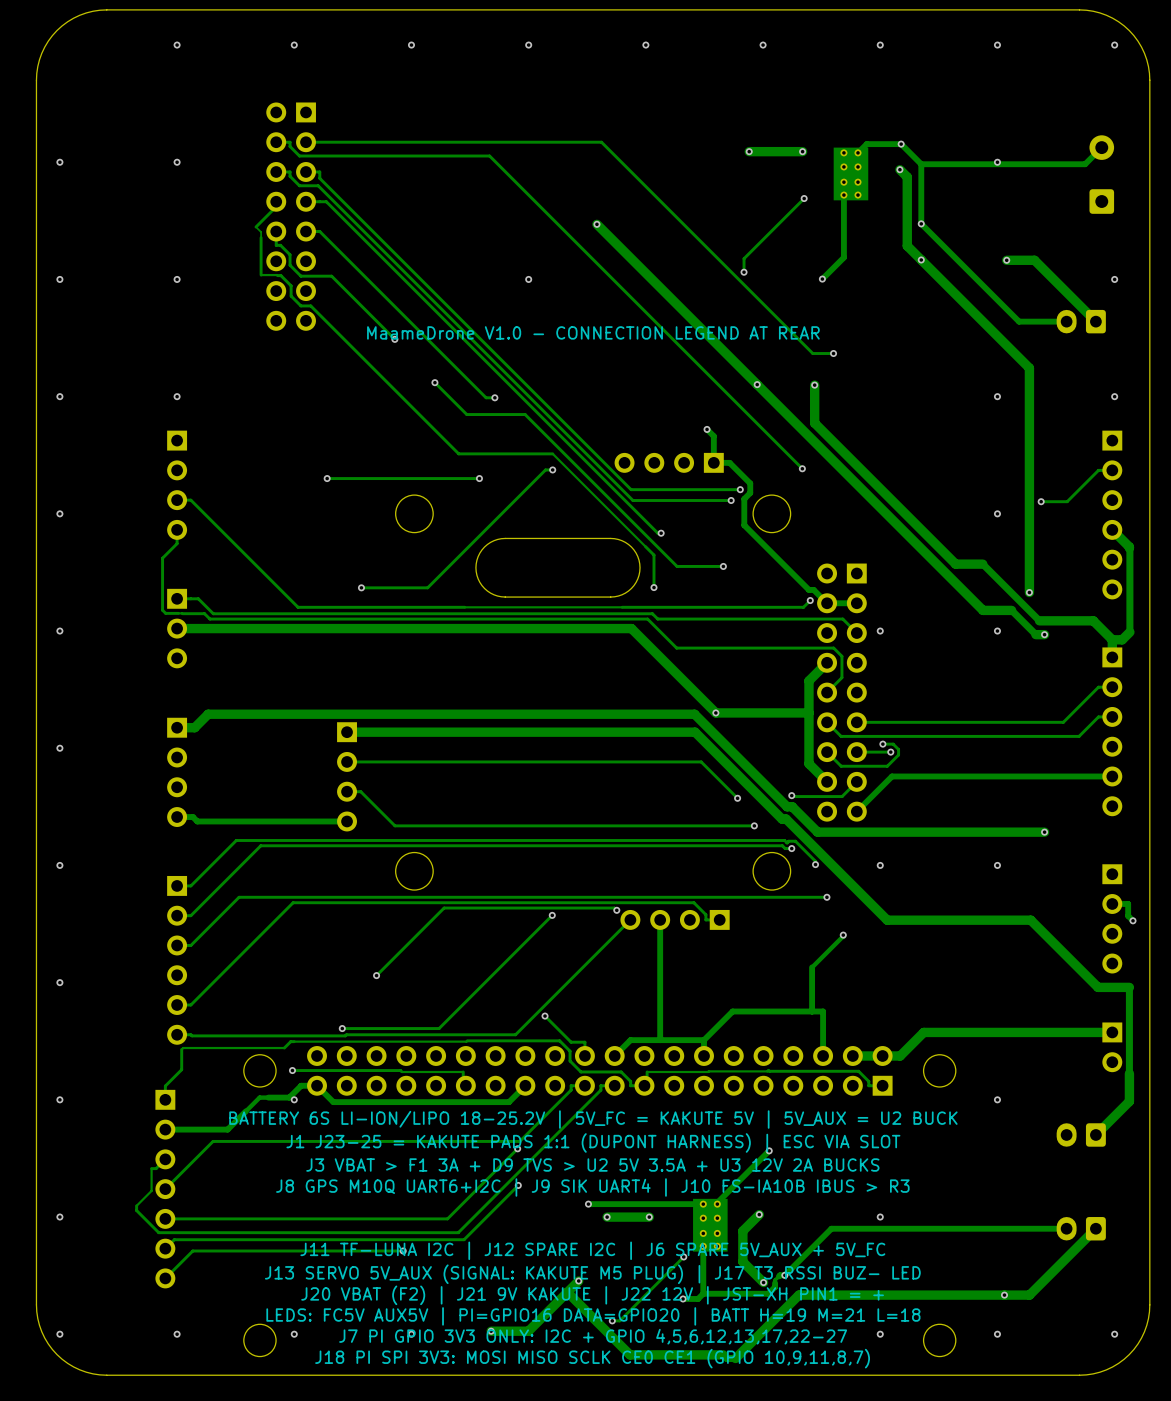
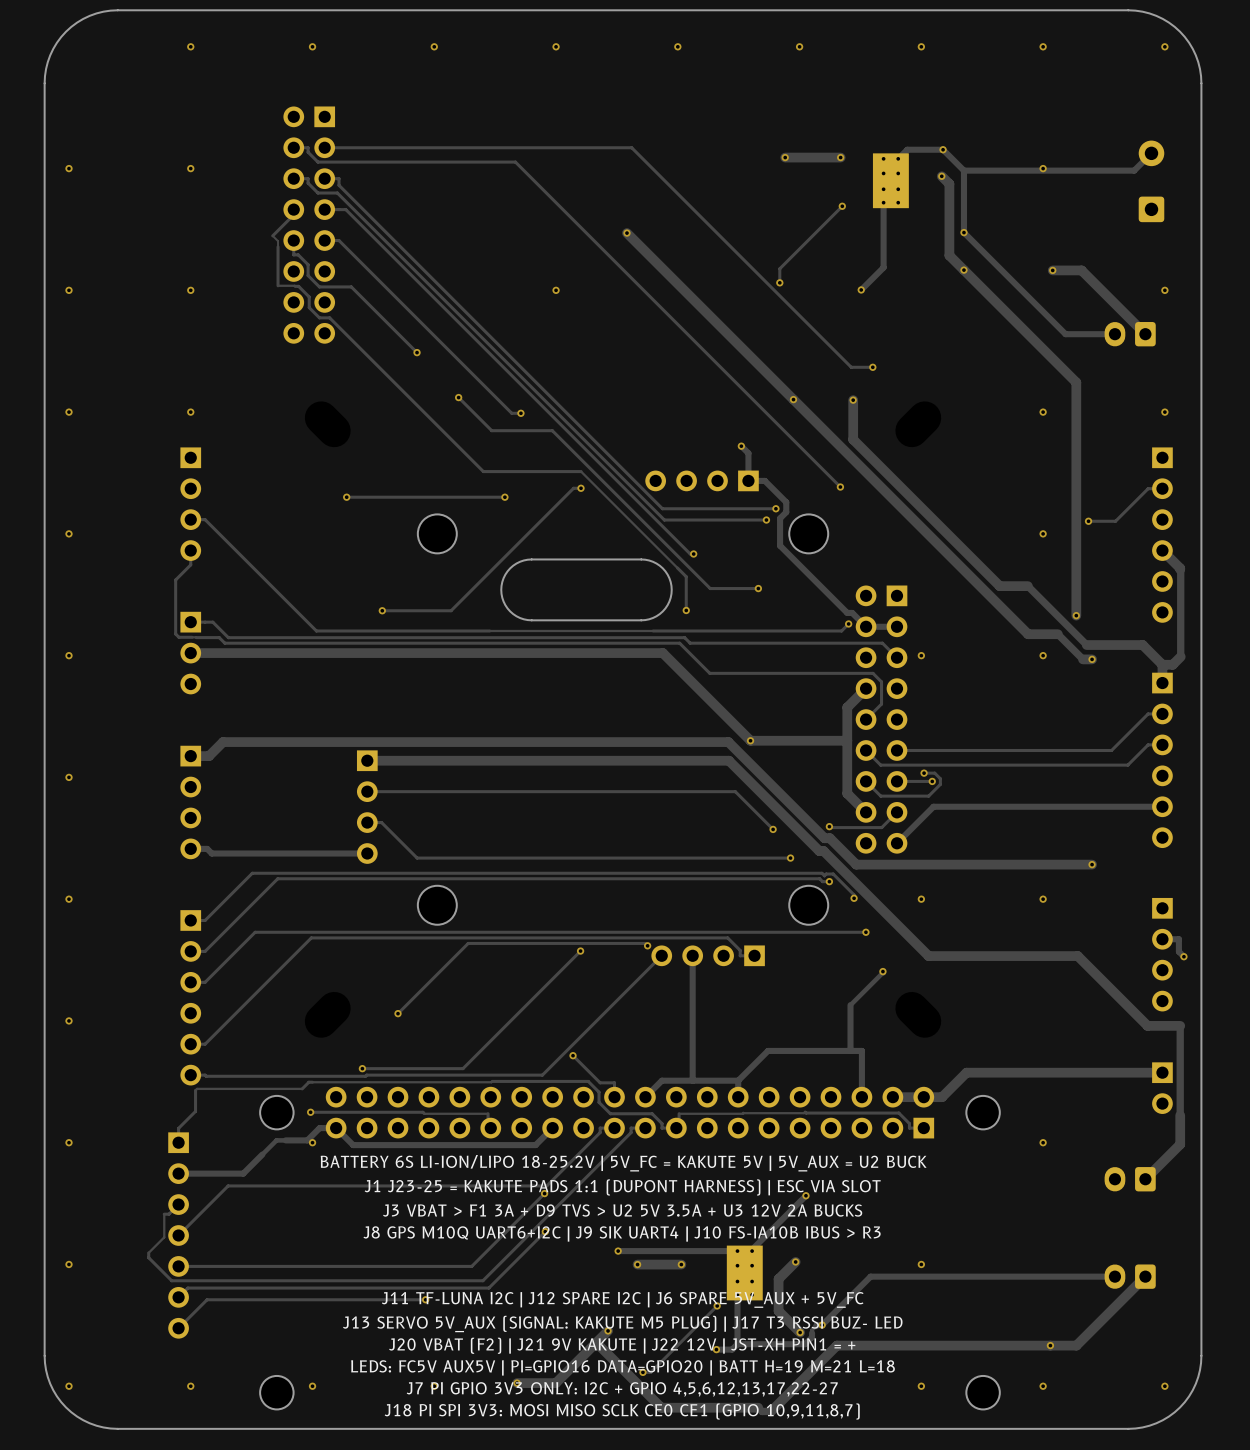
text: MaameDrone V1.0 - CONNECTION LEGEND AT REAR (593, 332) -> none

